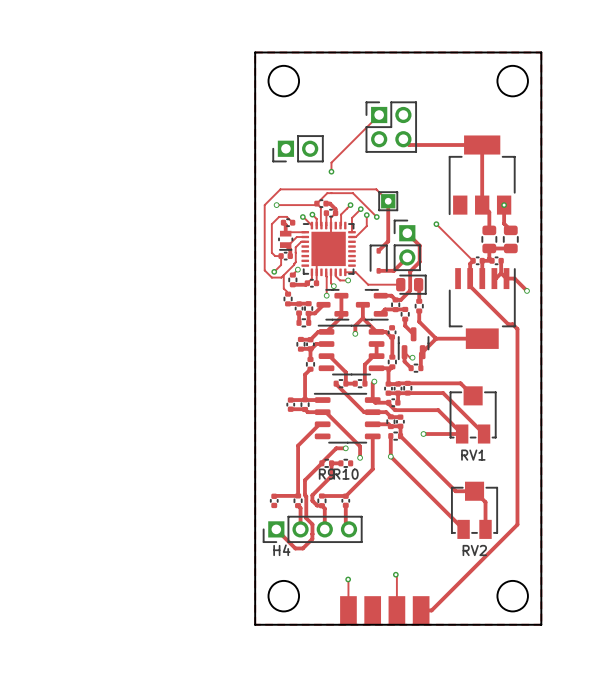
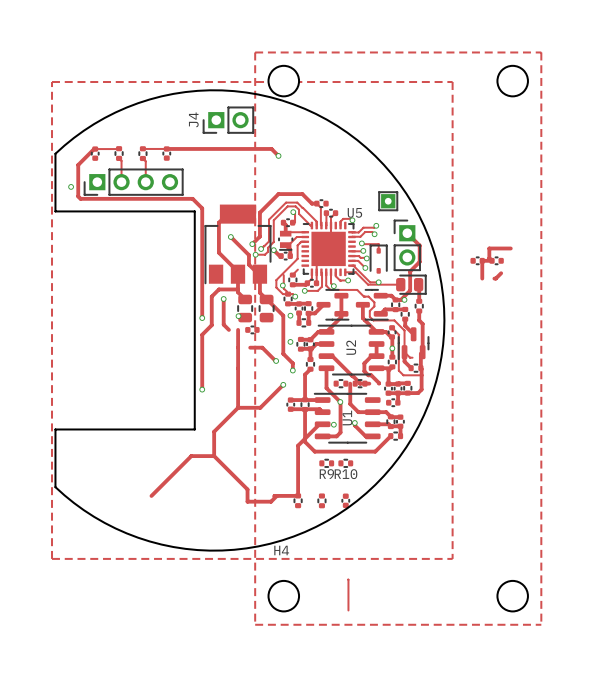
board edge: (255, 52) (255, 624) (541, 624) (541, 52) (255, 52) -> none
zone outline: none -> (52, 82) (52, 558) (452, 558) (452, 82) (52, 82)
track: (379, 115) (331, 162) (331, 171) -> none
J4: none -> (228, 120)
part: (391, 127) -> none
track: (403, 139) (409, 145) (482, 145) (482, 205) (489, 212) (489, 230) -> none
track: none -> (119, 148) (94, 149) (78, 164) (78, 196) (80, 198) (192, 198) (202, 208) (202, 318)
track: none -> (142, 148) (271, 148) (278, 155)
part: (298, 148) -> none
board edge: none -> (55, 153) (55, 211) (194, 211) (194, 429) (55, 429) (55, 487) (94, 516) (126, 533) (161, 544) (209, 550) (246, 548) (293, 536) (337, 515) (375, 484) (406, 447) (424, 415) (439, 368) (444, 332) (441, 284) (428, 237) (406, 193) (383, 164) (347, 132) (304, 108) (258, 94) (222, 90) (173, 93) (126, 107) (94, 124) (55, 153)
part: none -> (95, 153)
part: none -> (119, 153)
part: none -> (142, 153)
part: none -> (166, 153)
via: none -> (278, 155)
track: none -> (119, 158) (121, 160) (121, 182)
track: none -> (142, 158) (145, 161) (145, 182)
via: (331, 171) -> none
part: (482, 175) -> none
part: none -> (133, 182)
via: none -> (71, 186)
track: none -> (316, 203) (311, 203) (302, 194) (278, 194) (259, 212) (259, 236) (252, 244)
track: (326, 203) (329, 203) (335, 209) (335, 213) -> none
track: (276, 205) (315, 205) (327, 193) (352, 193) (376, 217) -> none
via position: (276, 205) -> (293, 212)
track: (350, 205) (341, 214) (340, 225) -> (352, 220) (343, 218) (340, 225)
via: (350, 205) -> none
track: (504, 205) (504, 223) (510, 230) -> none
via: (504, 205) -> none
track: (360, 209) (351, 217) (351, 232) -> (376, 225) (374, 227) (363, 227) (358, 232) (351, 232)
via: (360, 209) -> none
track: none -> (293, 212) (295, 222)
U5 name: none -> U5 (354, 212)
track: none -> (238, 214) (227, 214) (218, 222) (218, 252) (238, 271) (238, 292) (245, 299)
track: (312, 214) (316, 221) -> (261, 249) (269, 241) (269, 219) (286, 202) (297, 202) (316, 221)
via: (312, 214) -> none
track: (366, 215) (366, 226) (355, 237) (351, 237) -> (374, 234) (372, 231) (365, 231) (360, 236) (351, 237)
via: (366, 215) -> none
track: (302, 217) (311, 225) -> (255, 254) (265, 254) (268, 251) (268, 247) (273, 242) (273, 220) (287, 206) (295, 206) (299, 209) (299, 213) (311, 225)
via: (302, 217) -> none
via: (376, 217) -> none
via: none -> (352, 220)
track: (292, 222) (286, 216) (279, 216) (271, 224) (271, 252) (275, 256) (279, 256) -> (273, 250) (279, 256)
track: (436, 224) (473, 260) -> none
via: (436, 224) -> none
via: none -> (376, 225)
via: none -> (374, 234)
track: none -> (230, 237) (248, 255) (248, 264) (259, 274) (259, 292) (283, 315) (283, 353) (292, 363) (292, 370)
via: none -> (230, 237)
part: (489, 239) -> none
part: (510, 239) -> none
via: none -> (361, 243)
part: none -> (238, 244)
via: none -> (252, 244)
track: (297, 245) (295, 252) -> (297, 245) (297, 258) (276, 280) (276, 287) (282, 294) (292, 294) (295, 296)
via: none -> (261, 249)
via: none -> (273, 250)
track: none -> (363, 250) (351, 251)
via: none -> (363, 250)
track: (378, 250) (388, 241) (388, 201) (376, 189) (280, 189) (264, 205) (264, 270) (271, 277) (281, 277) (295, 262) (295, 252) -> (378, 250) (378, 244) (361, 243)
via: none -> (255, 254)
track: (281, 256) (281, 264) (274, 271) -> none
track: none -> (351, 256) (366, 258)
track: (407, 257) (393, 270) (378, 270) -> none
via: none -> (366, 258)
track: none -> (351, 260) (358, 260) (365, 268)
track: (473, 260) (470, 263) (470, 286) (508, 324) (512, 324) (517, 329) (517, 524) (431, 610) (421, 610) -> none
track: (501, 260) (501, 273) (506, 278) (514, 278) (527, 290) -> none
track: none -> (351, 265) (370, 282) (378, 282)
via: none -> (365, 268)
via: (297, 269) -> none
via: (274, 271) -> none
track: none -> (321, 272) (322, 286) (317, 290) (304, 290)
track: (326, 276) (326, 295) -> (326, 276) (326, 285) (330, 289) (357, 289) (363, 296) (368, 296) (374, 302) (374, 306) (369, 310) (369, 316) (373, 320) (394, 320) (404, 330) (404, 352)
via: none -> (378, 282)
via: none -> (282, 285)
track: none -> (238, 289) (218, 289) (211, 296) (211, 325) (202, 334) (202, 389)
via: none -> (304, 290)
via: (527, 290) -> none
via: (326, 295) -> none
via: none -> (295, 296)
track: none -> (223, 298) (223, 324) (228, 329)
via: none -> (223, 298)
via: none -> (404, 299)
part: none -> (245, 308)
part: none -> (266, 308)
part: (482, 308) -> none
via: none -> (290, 315)
via: none -> (238, 316)
via: none -> (202, 318)
track: (362, 318) (355, 325) (355, 333) -> none
track: (419, 320) (436, 338) -> (419, 320) (422, 323) (422, 352)
track: none -> (392, 327) (399, 334) (398, 370) (403, 375) (421, 375)
track: none -> (238, 329) (238, 407)
via: (355, 333) -> none
track: (436, 338) (422, 352) -> none
track: (436, 338) (482, 338) -> none
via: none -> (290, 341)
track: none -> (250, 347) (262, 347) (276, 360)
U2 name: none -> U2 (351, 347)
via: none -> (392, 348)
track: (329, 356) (345, 372) (345, 383) (355, 383) -> (329, 356) (332, 356) (359, 383) (369, 383)
track: (373, 356) (364, 364) (364, 383) -> (373, 356) (364, 363) (364, 371) (379, 383)
via: (412, 357) -> none
via: none -> (276, 360)
track: none -> (326, 368) (326, 388) (340, 402) (340, 432) (336, 436) (322, 436)
via: none -> (292, 370)
track: (374, 381) (372, 383) (372, 400) (375, 402) (388, 402) (395, 410) (438, 410) (462, 434) (423, 434) -> none
via: (374, 381) -> none
track: (336, 383) (364, 412) -> (350, 383) (350, 404) (358, 412) (364, 412)
track: (407, 383) (460, 383) (473, 395) -> none
track: none -> (283, 384) (260, 407) (238, 407)
via: none -> (283, 384)
via: none -> (202, 389)
track: (418, 393) (443, 393) (484, 434) -> (418, 393) (421, 389) (420, 368)
via: none -> (340, 402)
track: none -> (238, 407) (214, 431) (214, 456)
track: (304, 409) (307, 412) (325, 412) (360, 446) (360, 457) -> (304, 409) (319, 409) (322, 412)
RV1: (473, 414) -> none
U1 name: none -> U1 (347, 418)
via: none -> (354, 422)
via: none -> (333, 424)
via: (423, 434) -> none
track: (372, 436) (372, 469) (345, 496) (321, 496) -> (372, 436) (365, 436) (354, 425) (354, 422)
track: (390, 436) (390, 456) (463, 529) -> (390, 436) (375, 451) (314, 451) (305, 441) (305, 409)
track: (400, 436) (455, 491) (474, 491) (485, 502) (485, 529) -> none
track: (345, 448) (336, 448) (304, 480) (306, 518) (312, 524) (312, 534) -> none
via: (345, 448) -> none
track: none -> (214, 456) (191, 456) (151, 495)
track: none -> (214, 456) (247, 489) (247, 501) (271, 501) (276, 495)
via: (390, 456) -> none
via: (360, 457) -> none
track: (340, 463) (331, 463) (331, 476) (312, 495) (312, 500) (324, 508) (324, 529) -> none
part rotation: 0° (274, 500) -> 90° clockwise (252, 329)
part position: (274, 500) -> (252, 329)
track: (298, 505) (300, 508) (300, 529) -> none
track: (345, 505) (345, 526) (349, 529) -> none
RV2: (474, 510) -> none
track: (276, 529) (295, 548) (302, 548) (312, 538) (312, 534) -> none
part: (312, 529) -> none
track: (395, 574) (396, 610) -> none
via: (395, 574) -> none
via: (348, 579) -> none
part: (384, 610) -> none

